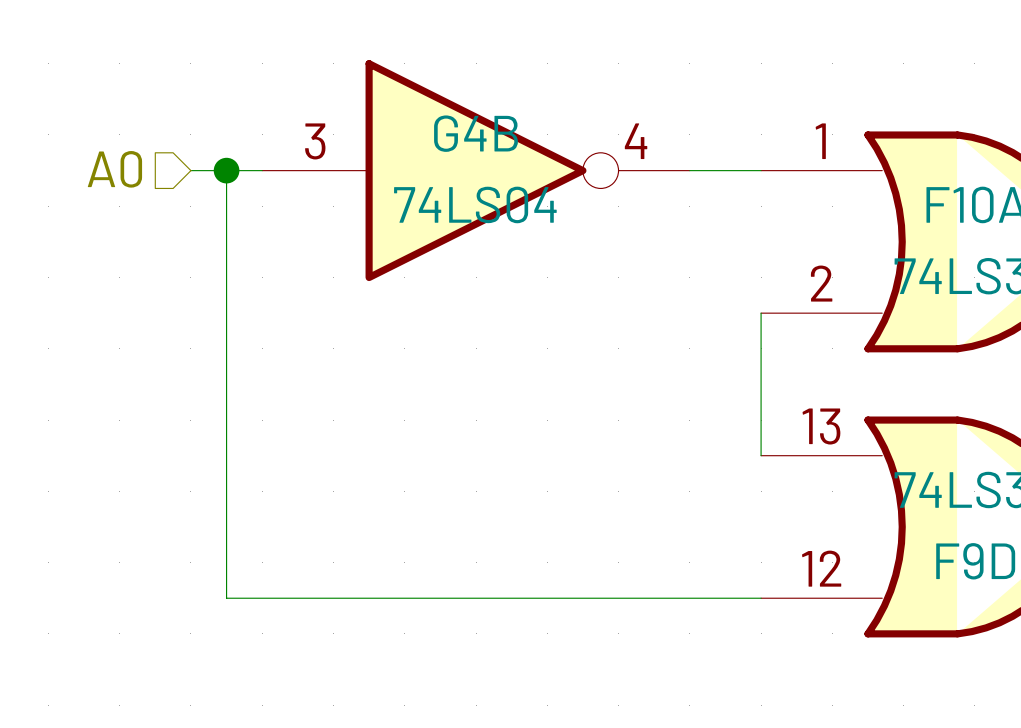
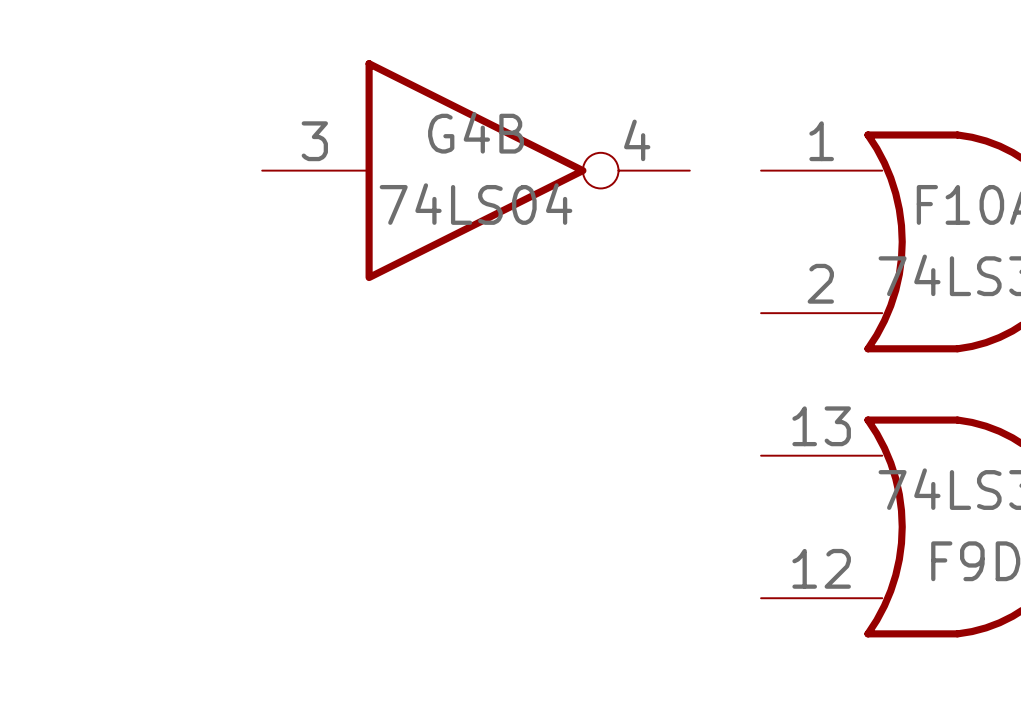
hierarchical label: A0 (114, 169) -> none
wire: (190, 170) (262, 170) -> none
wire: (226, 170) (226, 598) (761, 598) -> none
junction: (226, 170) -> none
wire: (689, 170) (761, 170) -> none
wire: (761, 313) (761, 455) -> none

